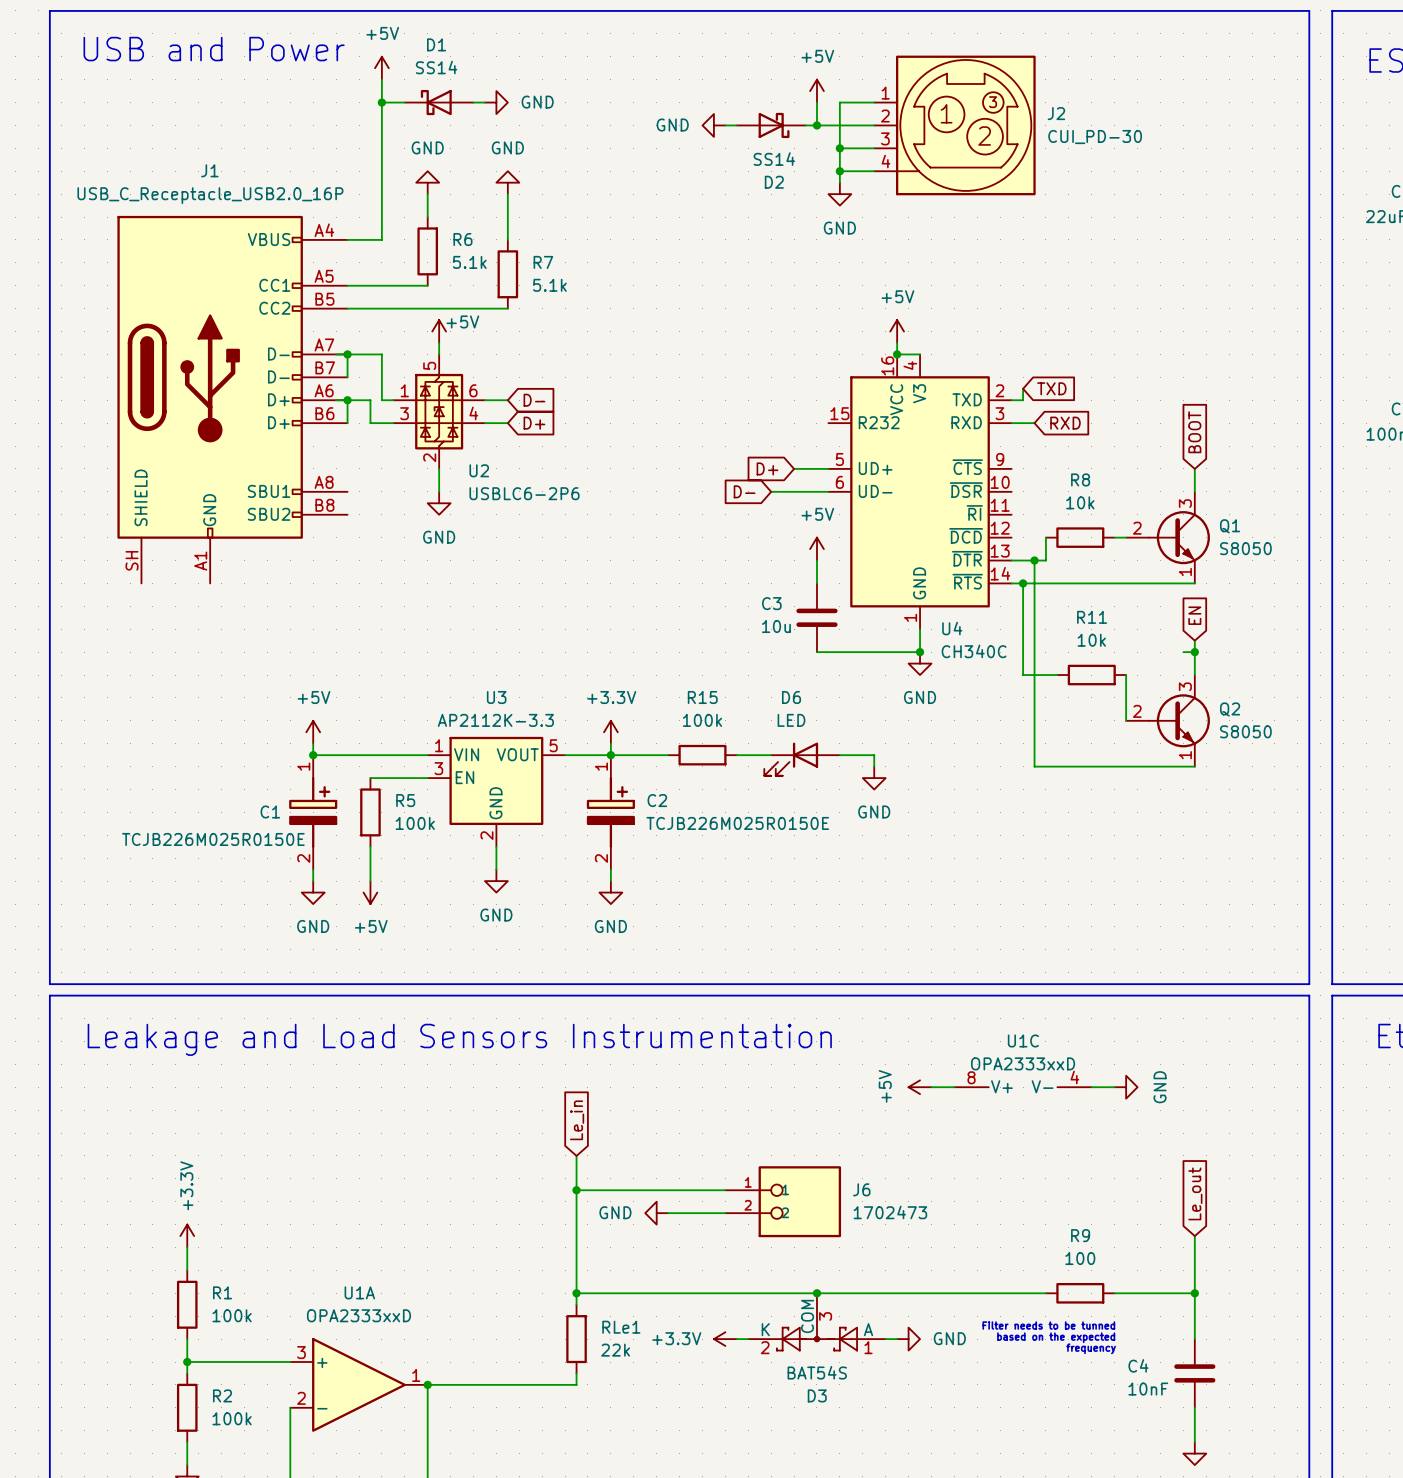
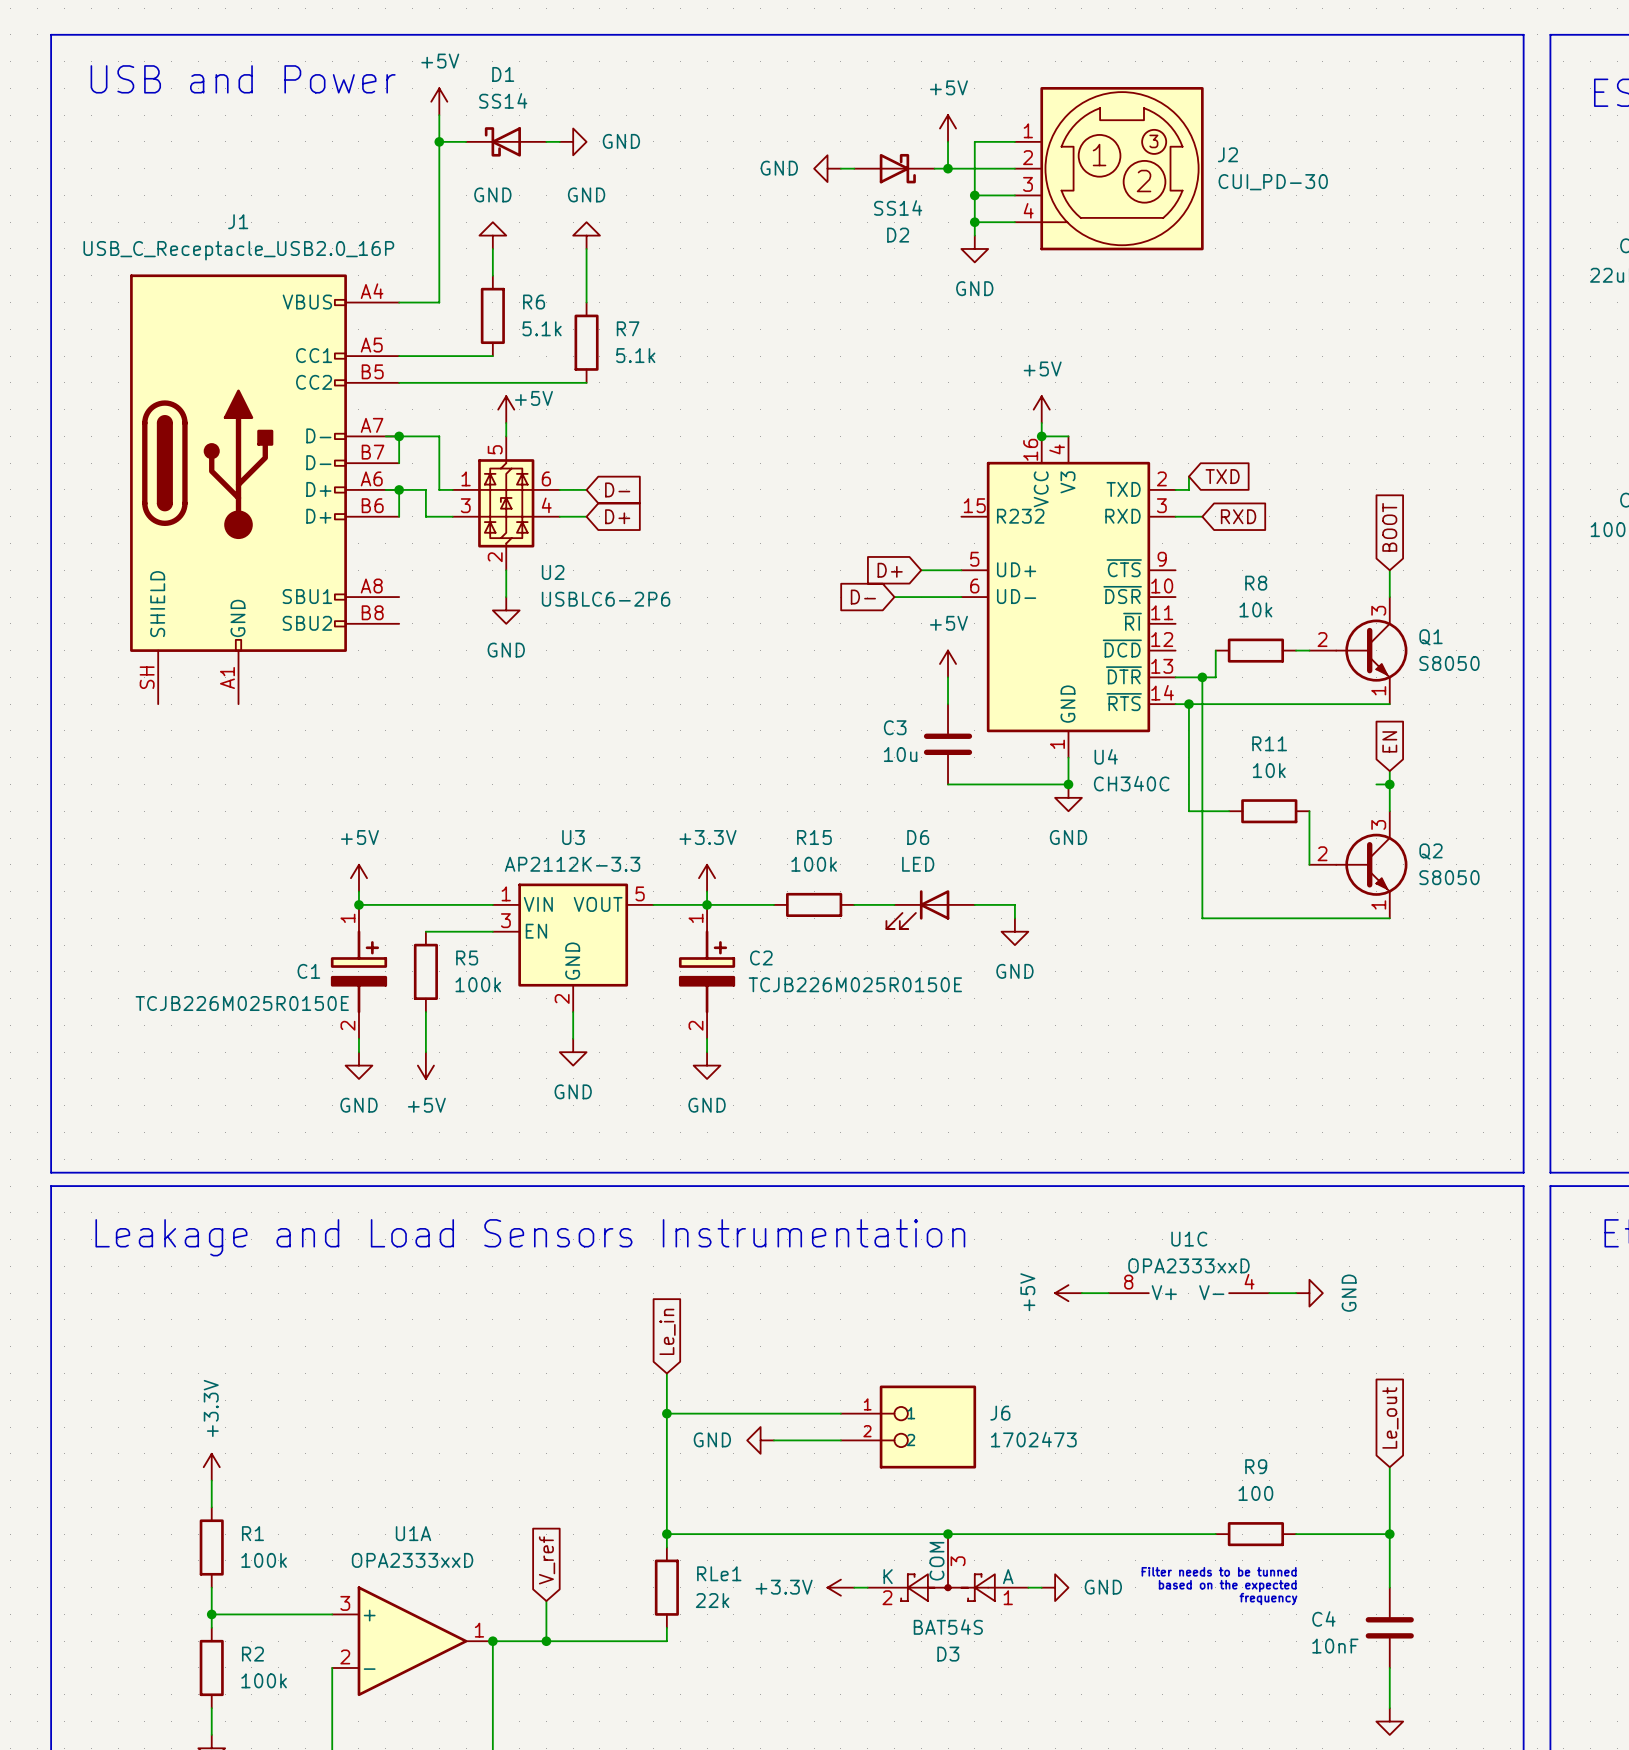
global label: none -> V_ref (547, 1560)
wire: none -> (546, 1601) (546, 1641)
junction: none -> (546, 1641)

